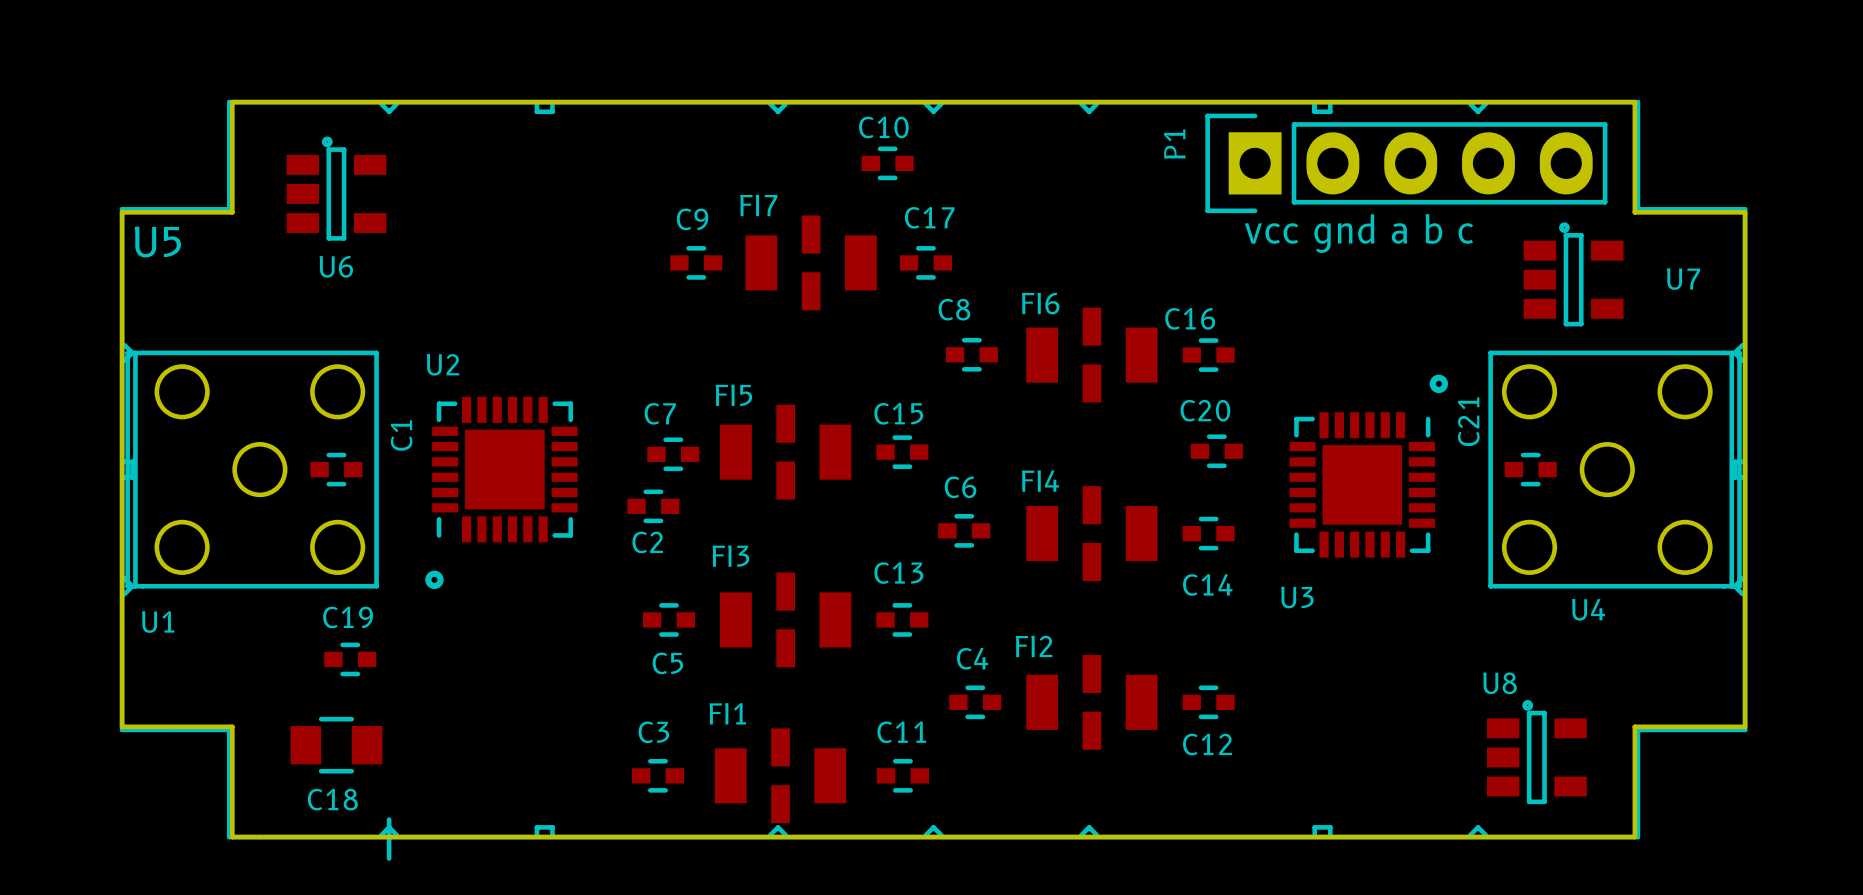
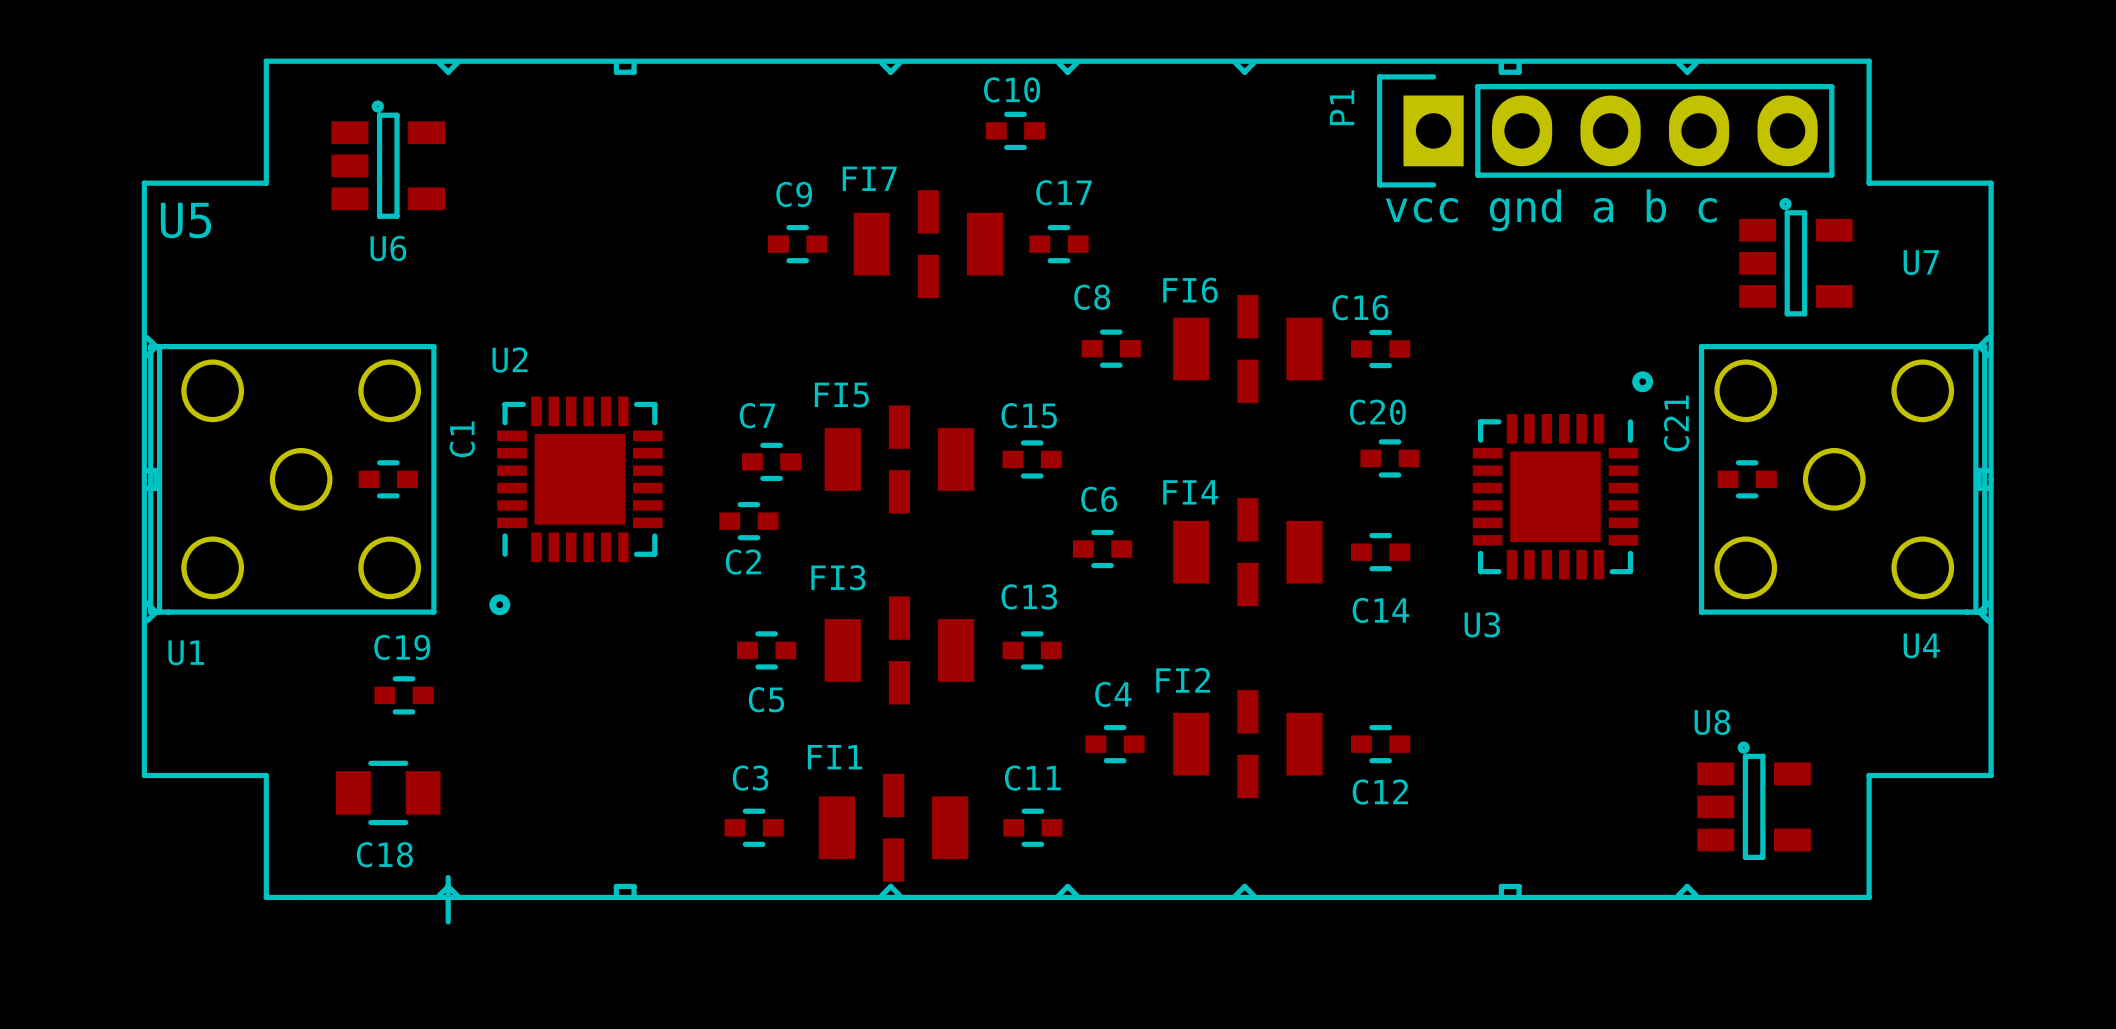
board edge: (232, 102) (232, 212) (122, 212) (122, 726) (232, 726) (232, 837) (1634, 837) (1634, 726) (1745, 726) (1745, 212) (1634, 212) (1634, 102) (232, 102) -> none
U4 name position: U4 (1588, 609) -> U4 (1921, 645)

